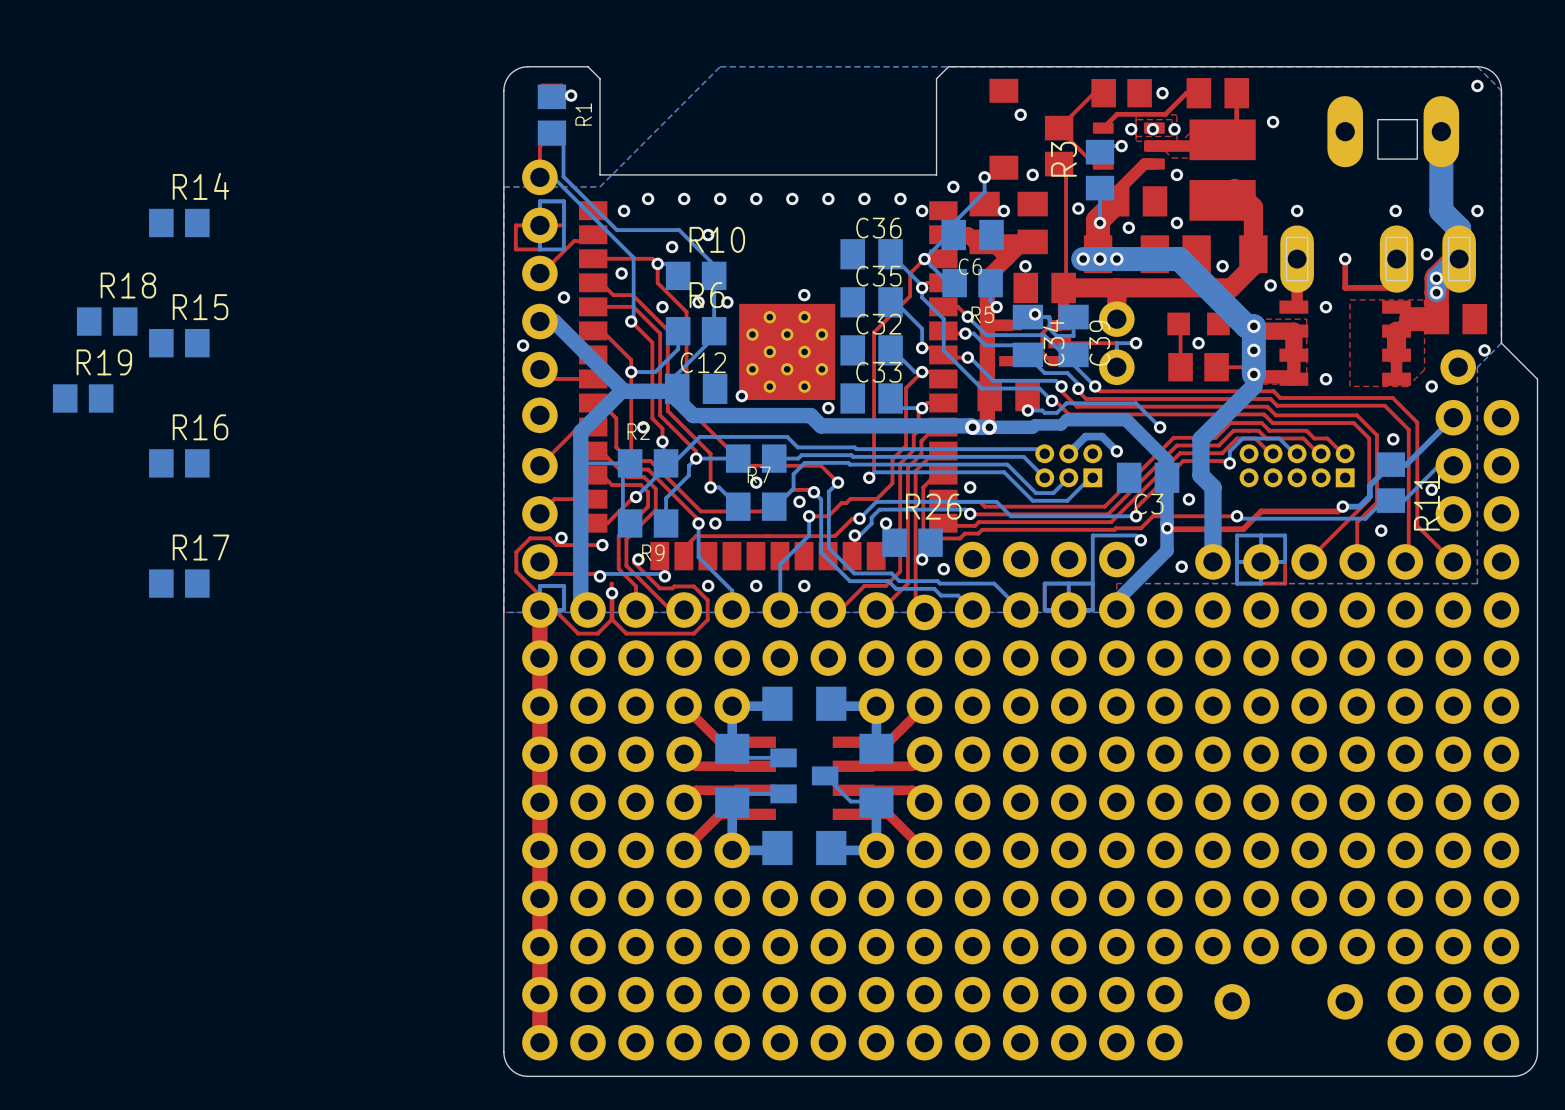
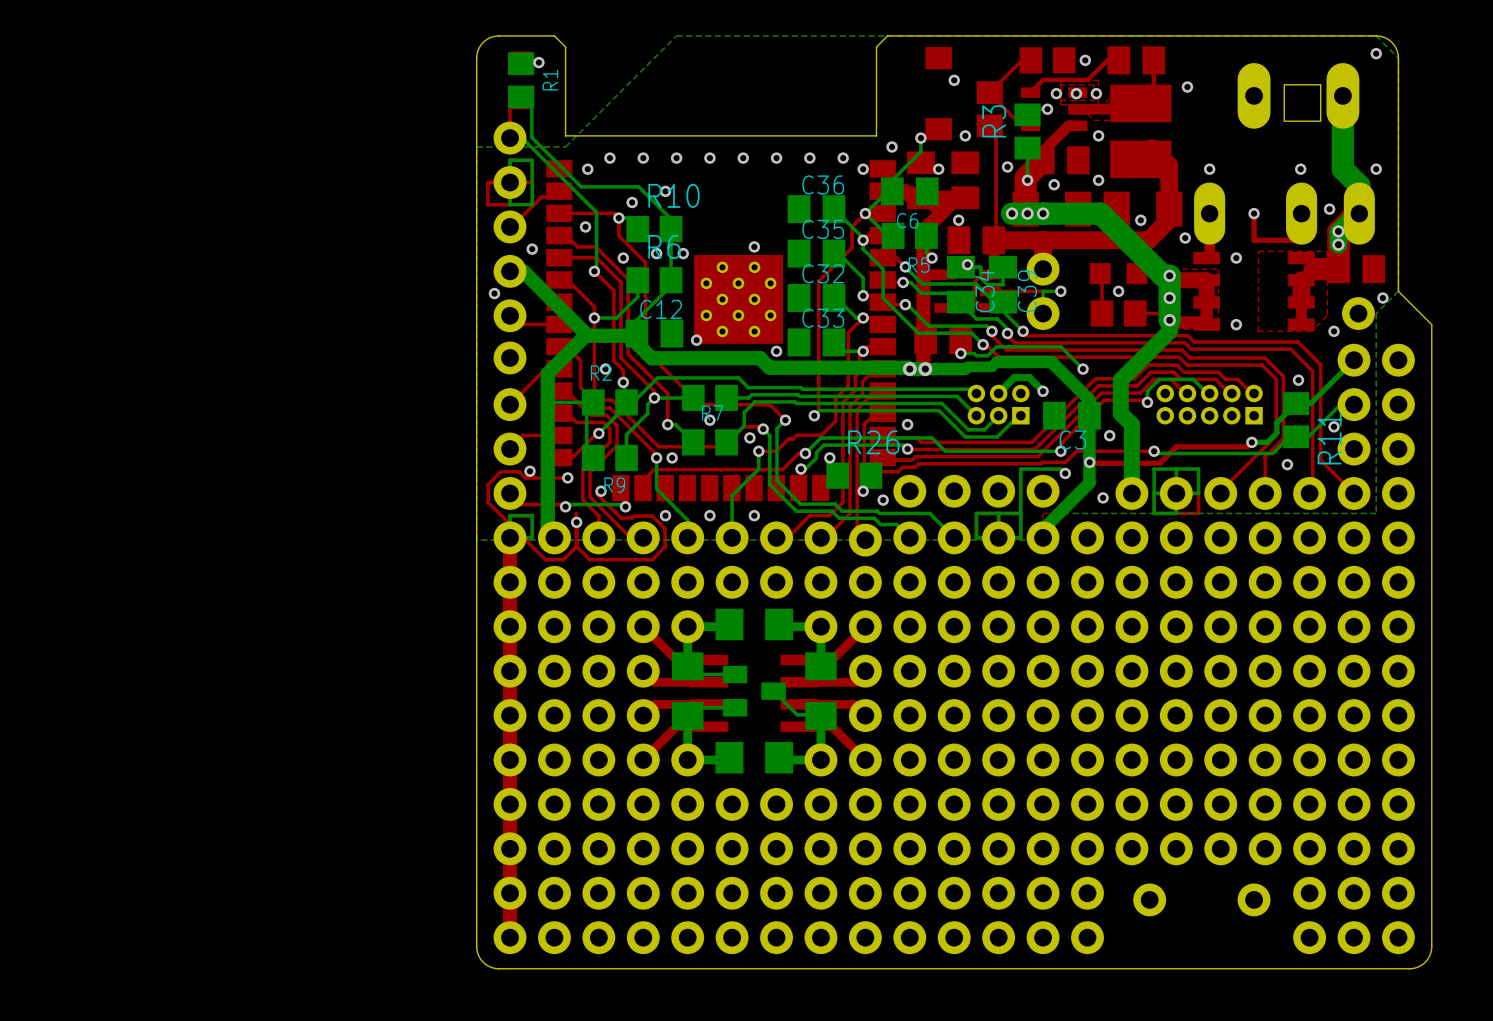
R14: (179, 223) -> none
R18: (107, 321) -> none
R15: (179, 343) -> none
R19: (83, 398) -> none
R16: (179, 463) -> none
R17: (179, 583) -> none

